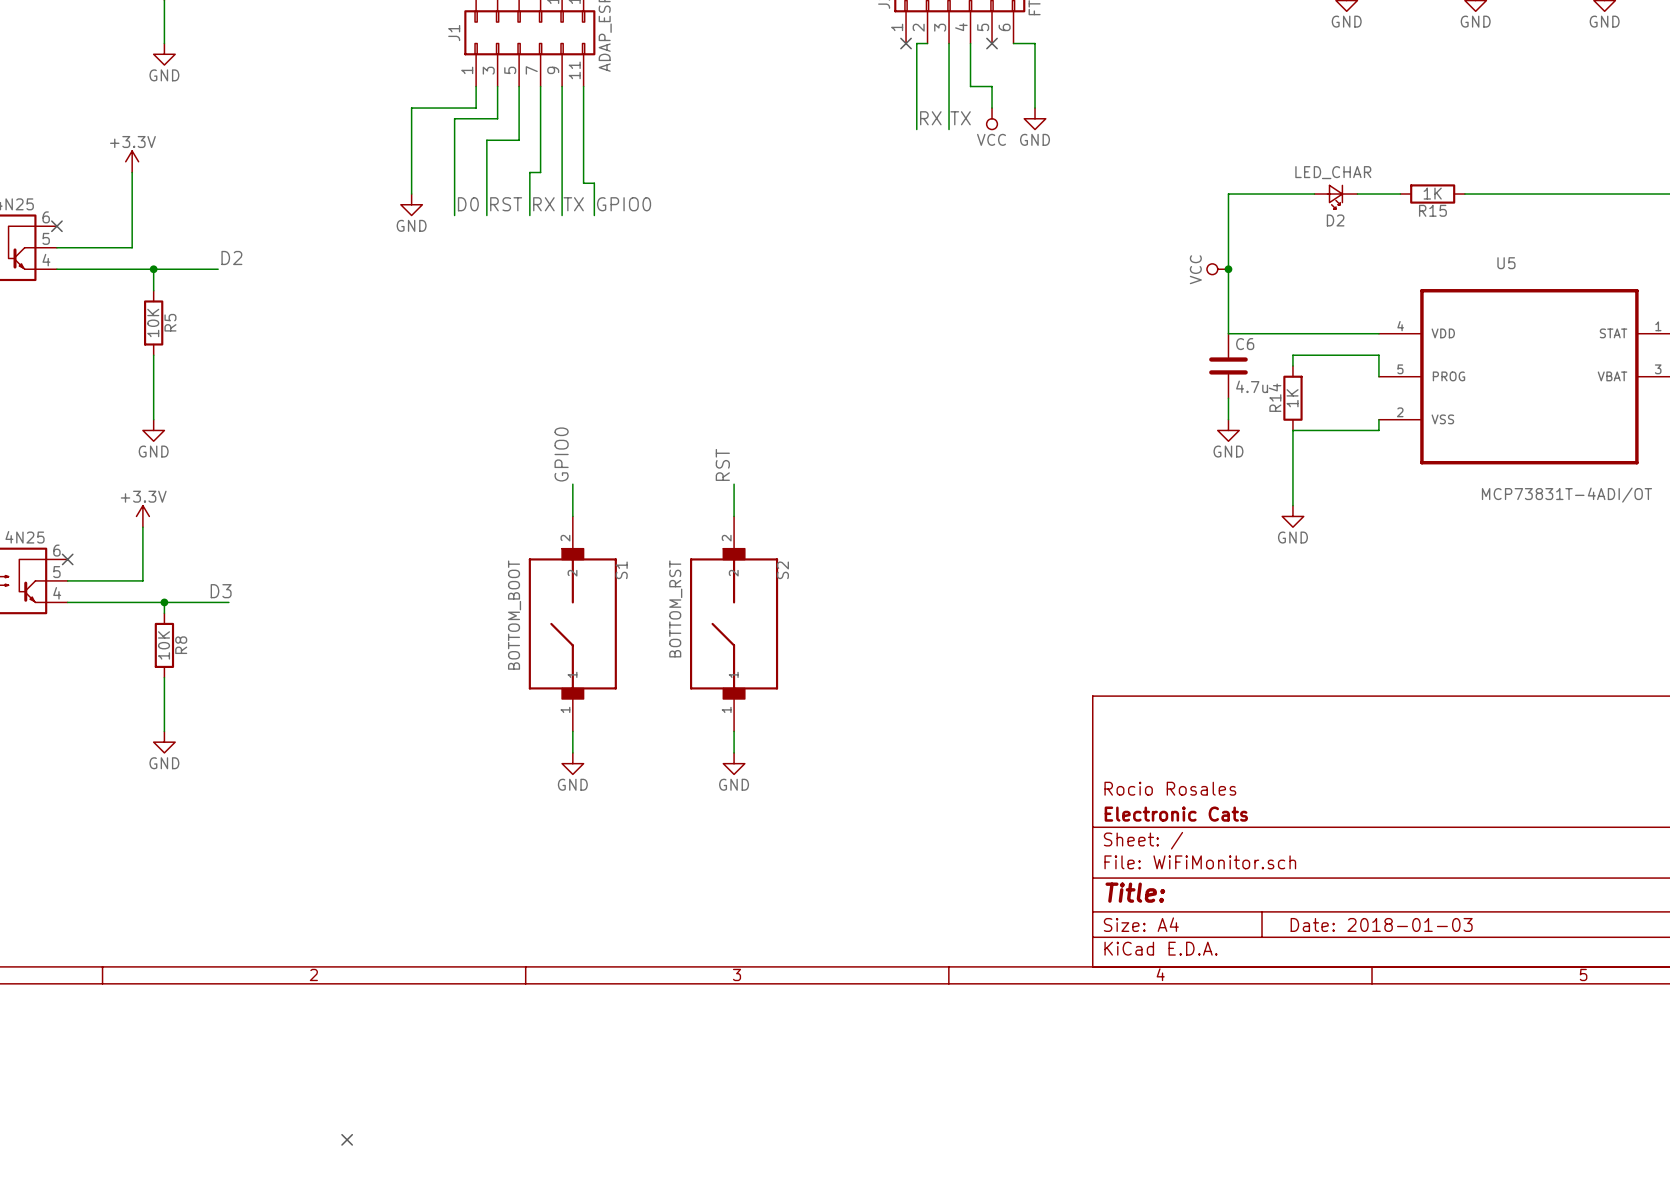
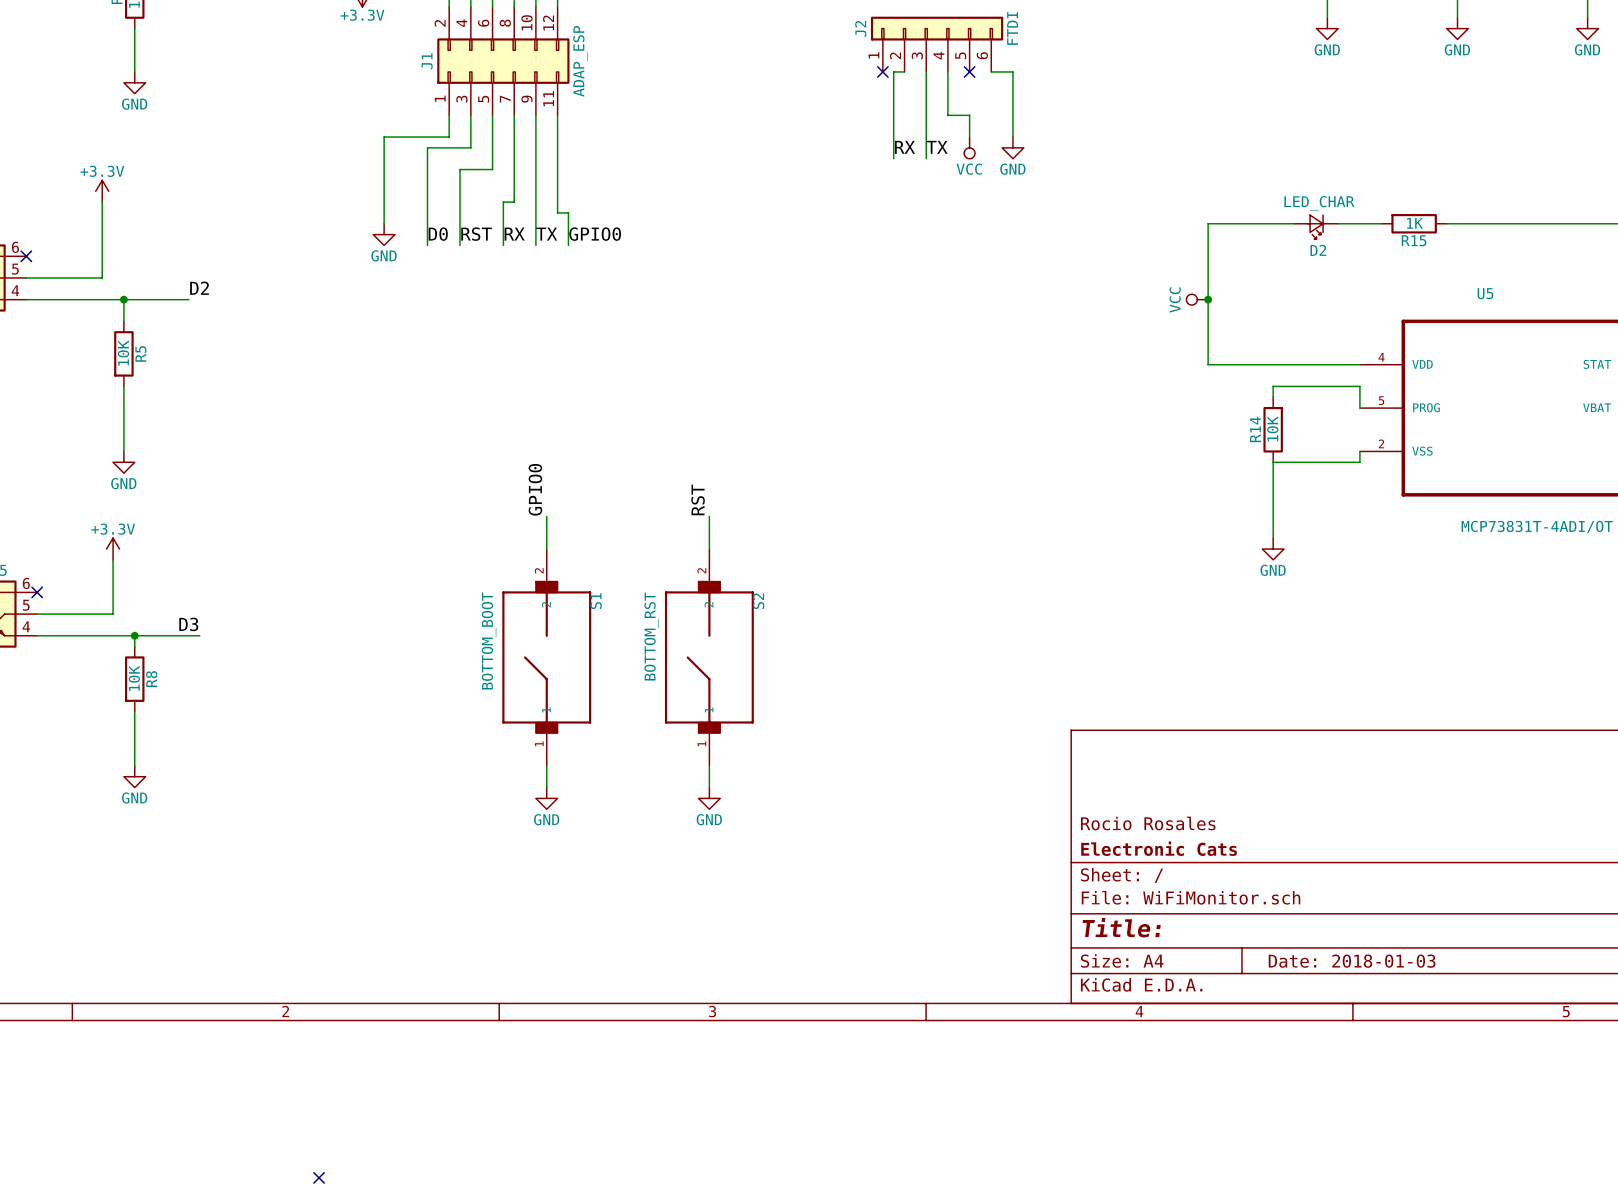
C6: 4.7u (1228, 365) -> none
wire: (1228, 398) (1228, 419) -> none
R14 value: 1K (1292, 398) -> 10K (1272, 428)
power symbol: GND (1228, 430) -> none

